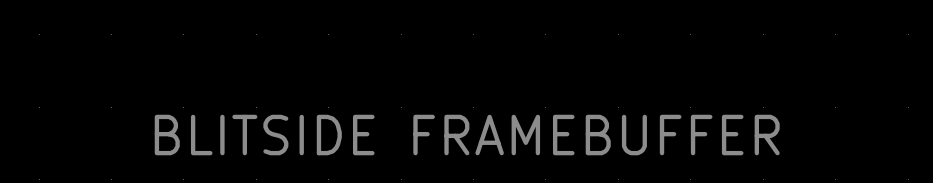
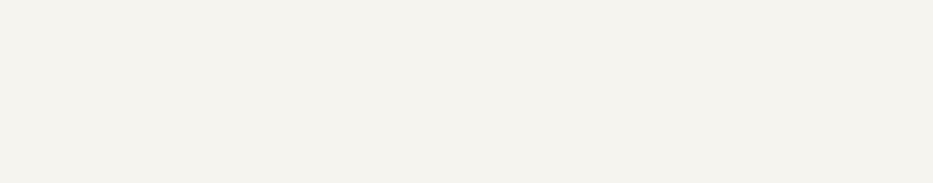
text: BLITSIDE FRAMEBUFFER (467, 135) -> none

